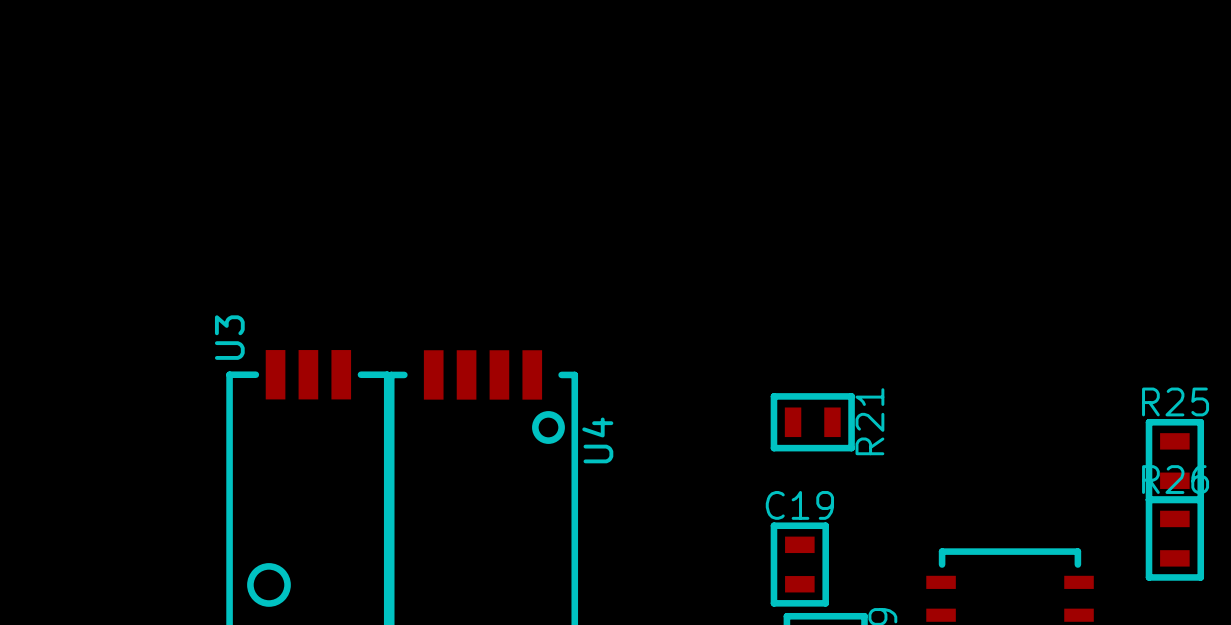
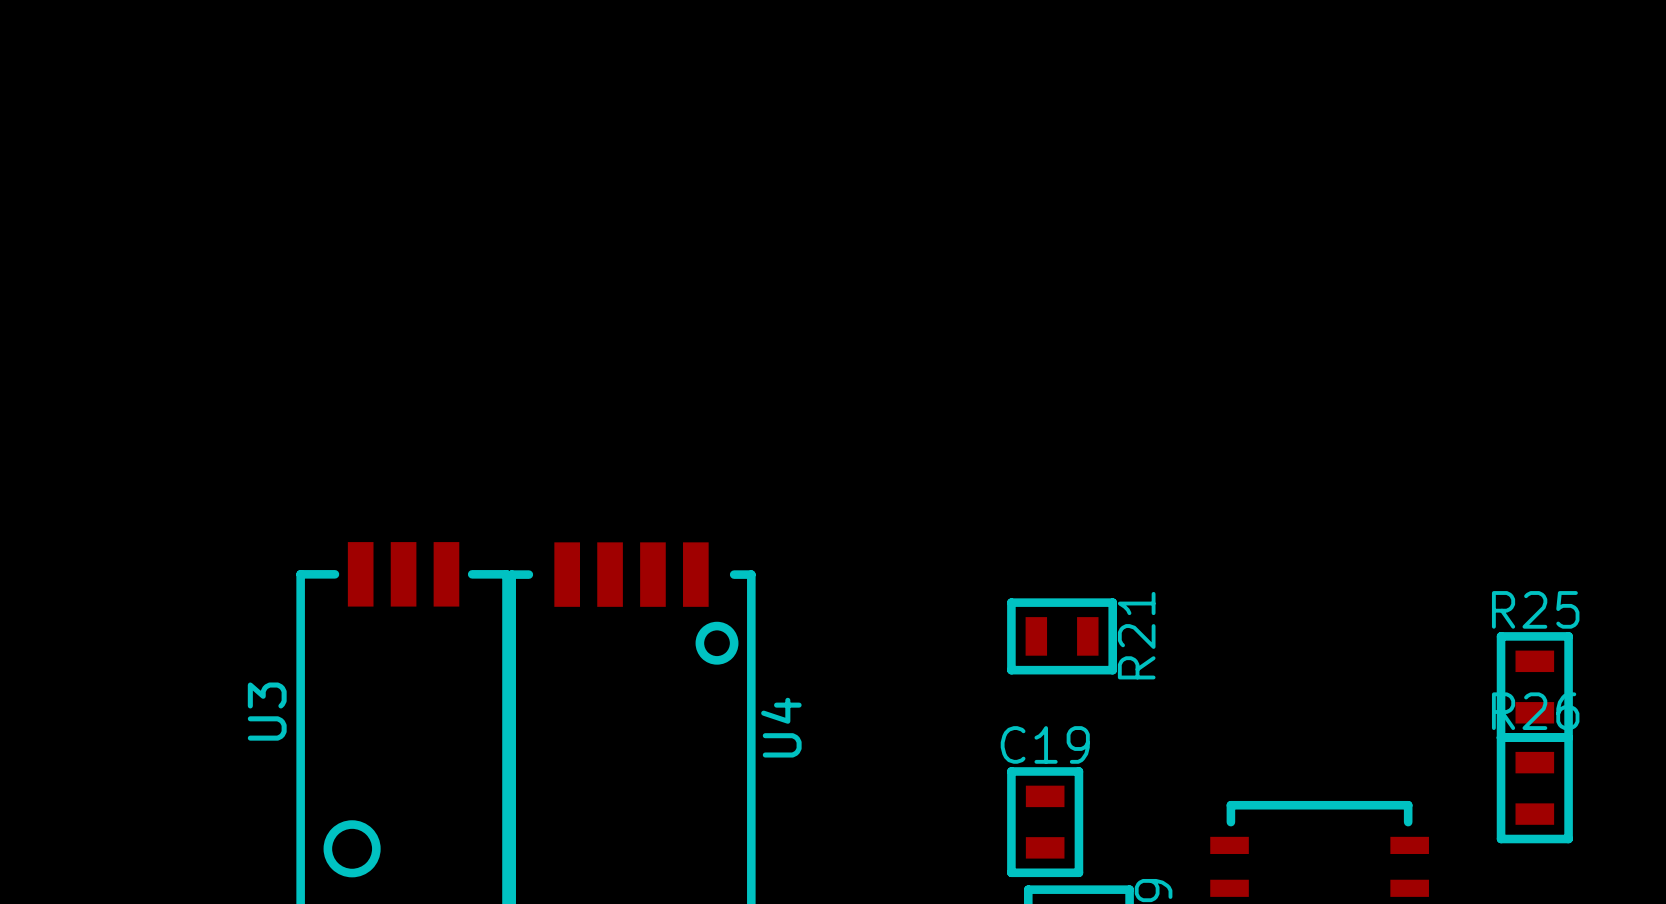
U3 name position: U3 (229, 337) -> U3 (267, 711)
U4 name position: U4 (597, 440) -> U4 (781, 727)

